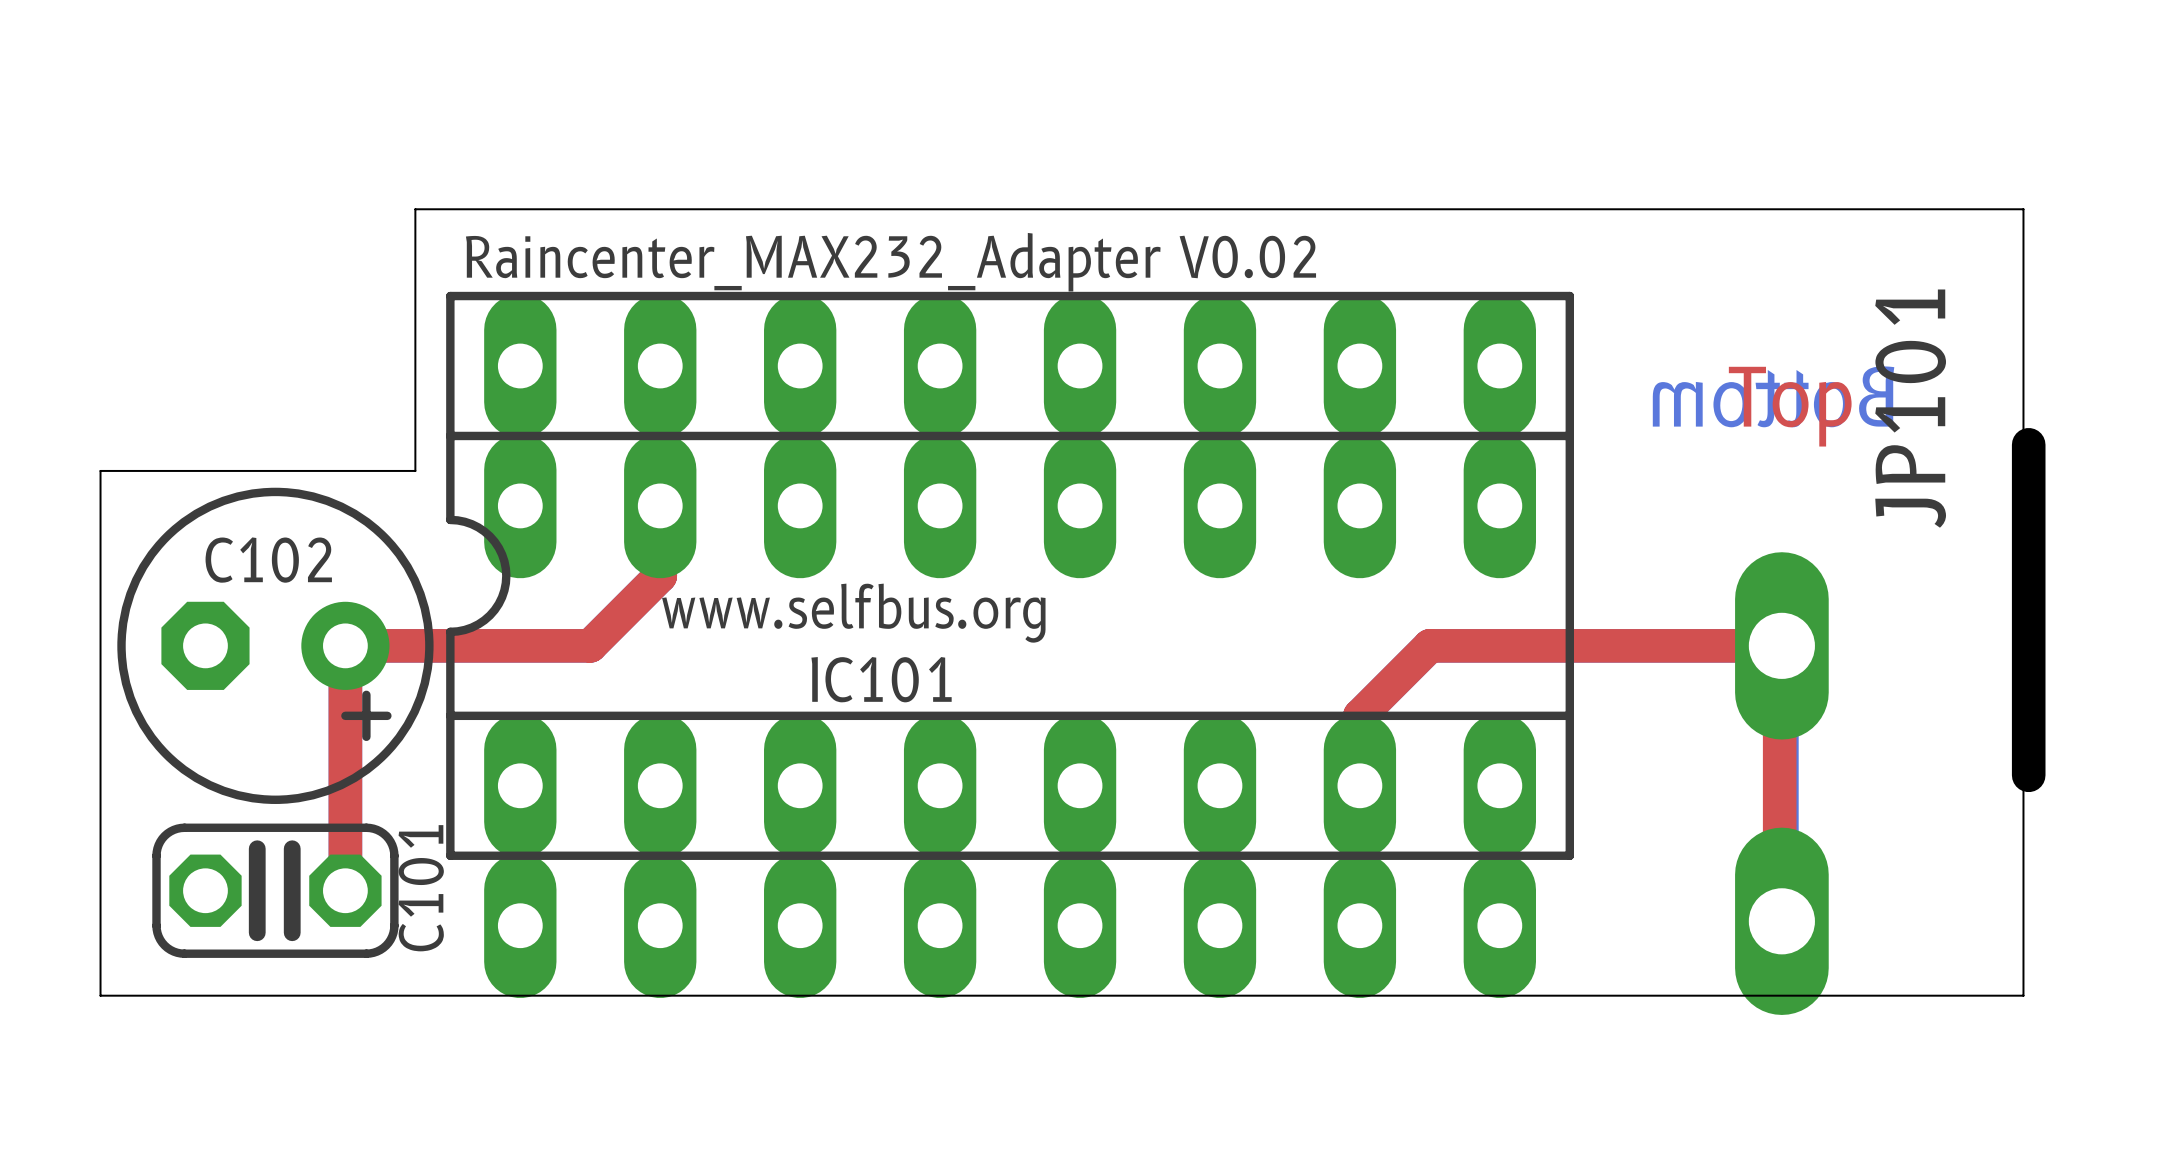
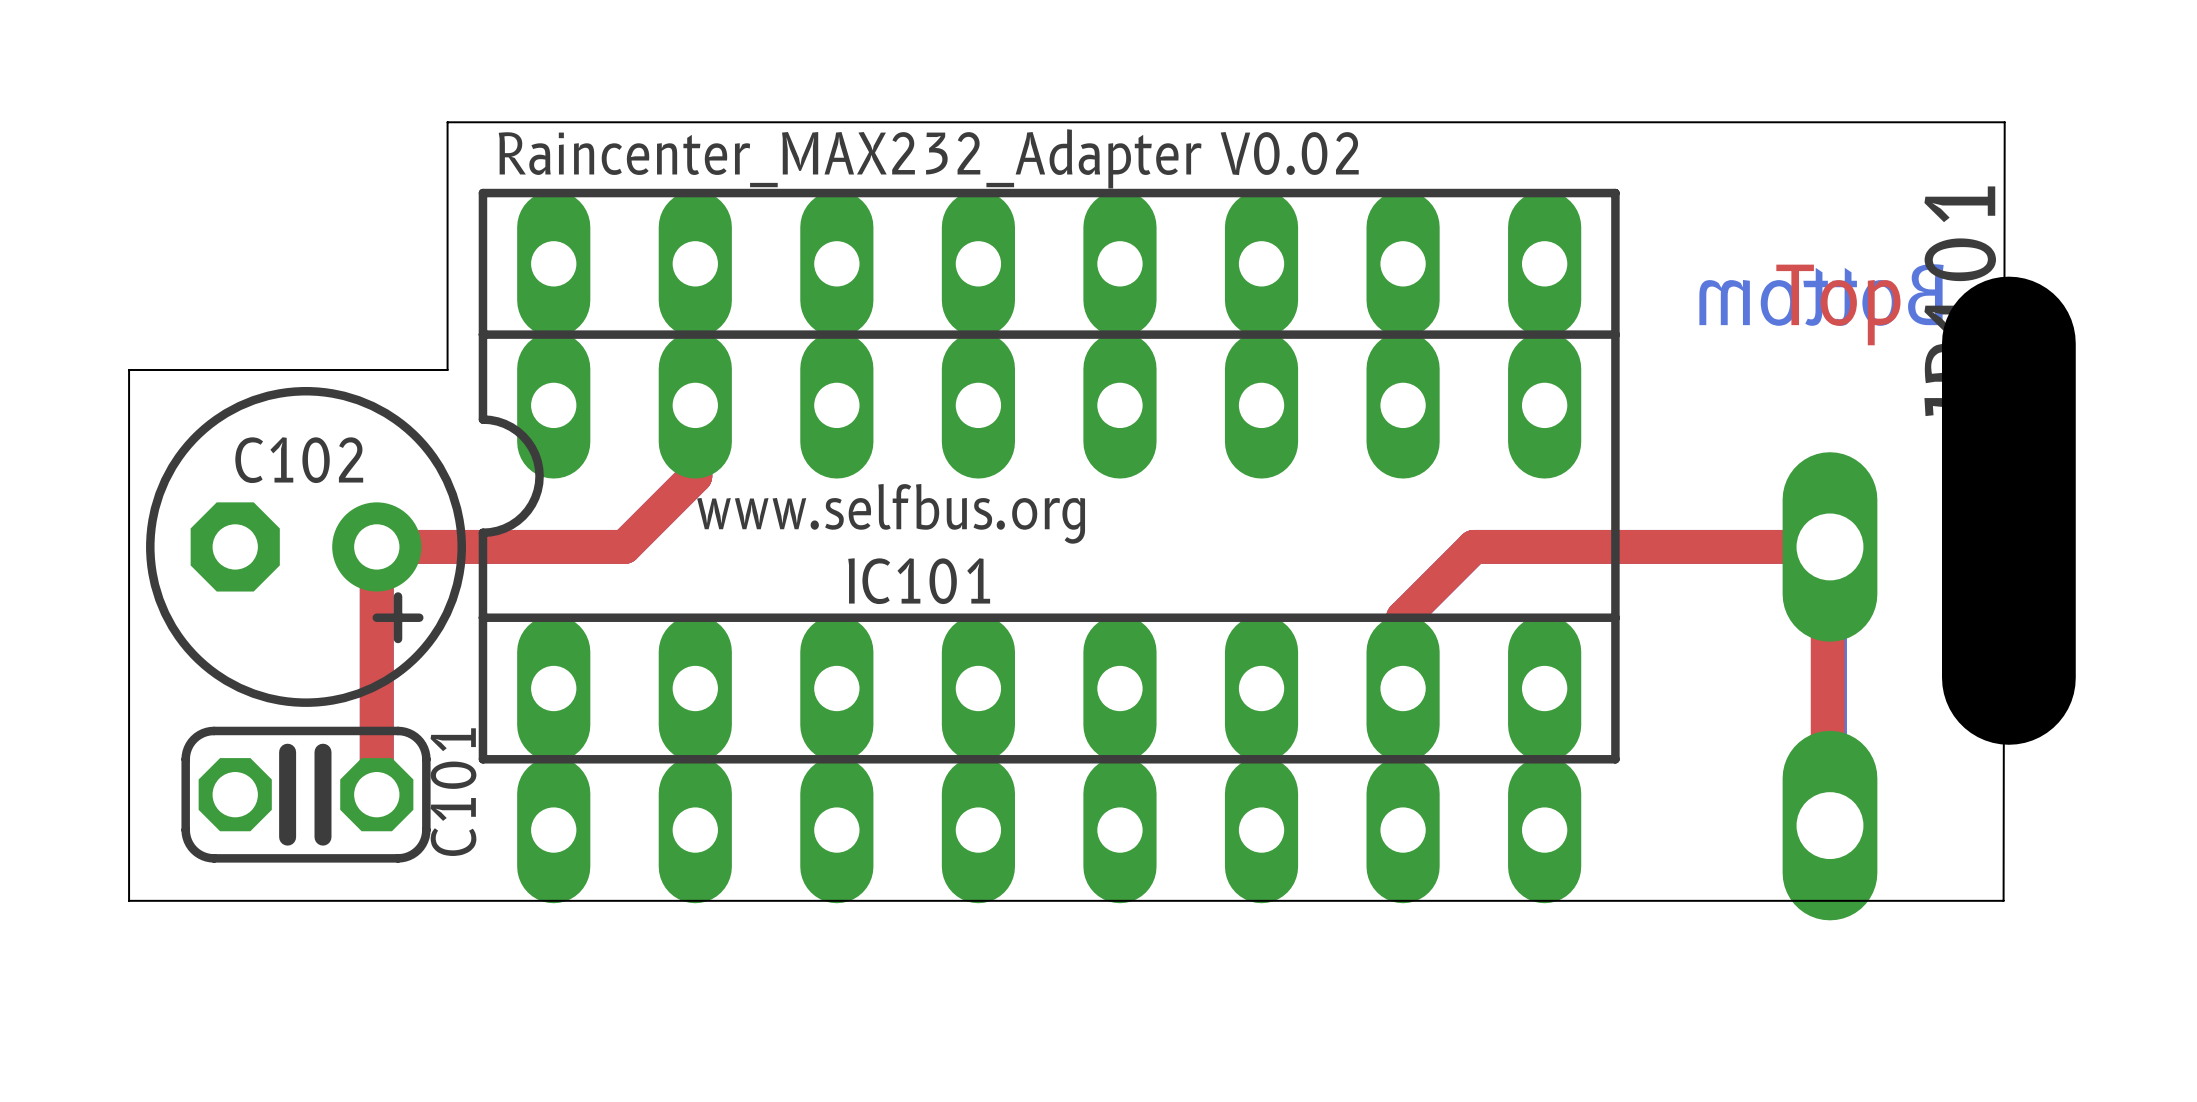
board edge: (415, 226) (415, 209) (2023, 209) (2023, 995) (1953, 995) -> (447, 122) (2004, 122) (2003, 900)
board edge: (2028, 444) (2028, 775) -> (2008, 343) (2008, 677)

